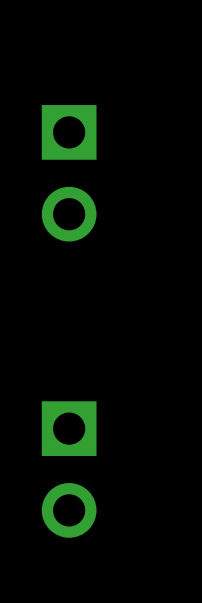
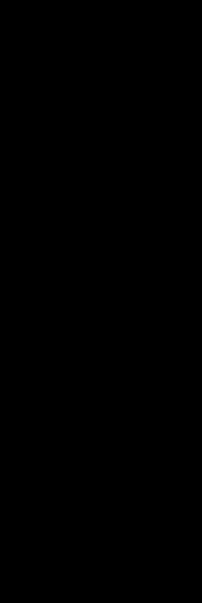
part: (69, 173) -> none
part: (69, 469) -> none

